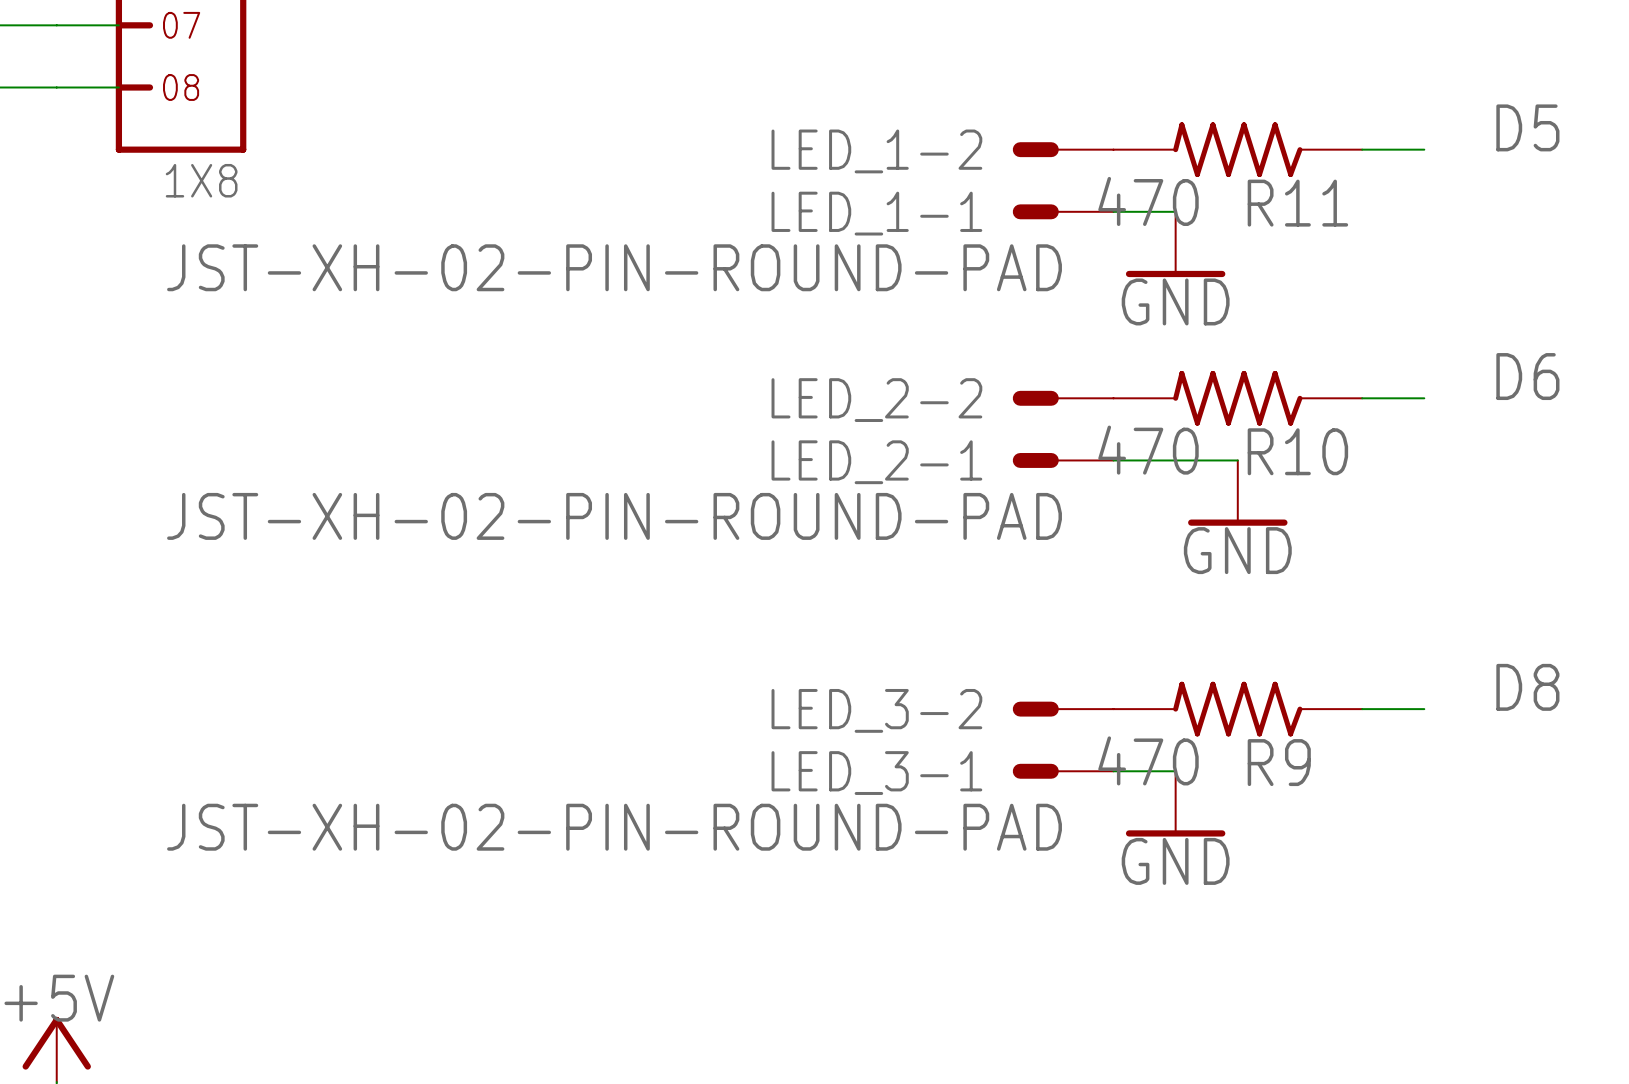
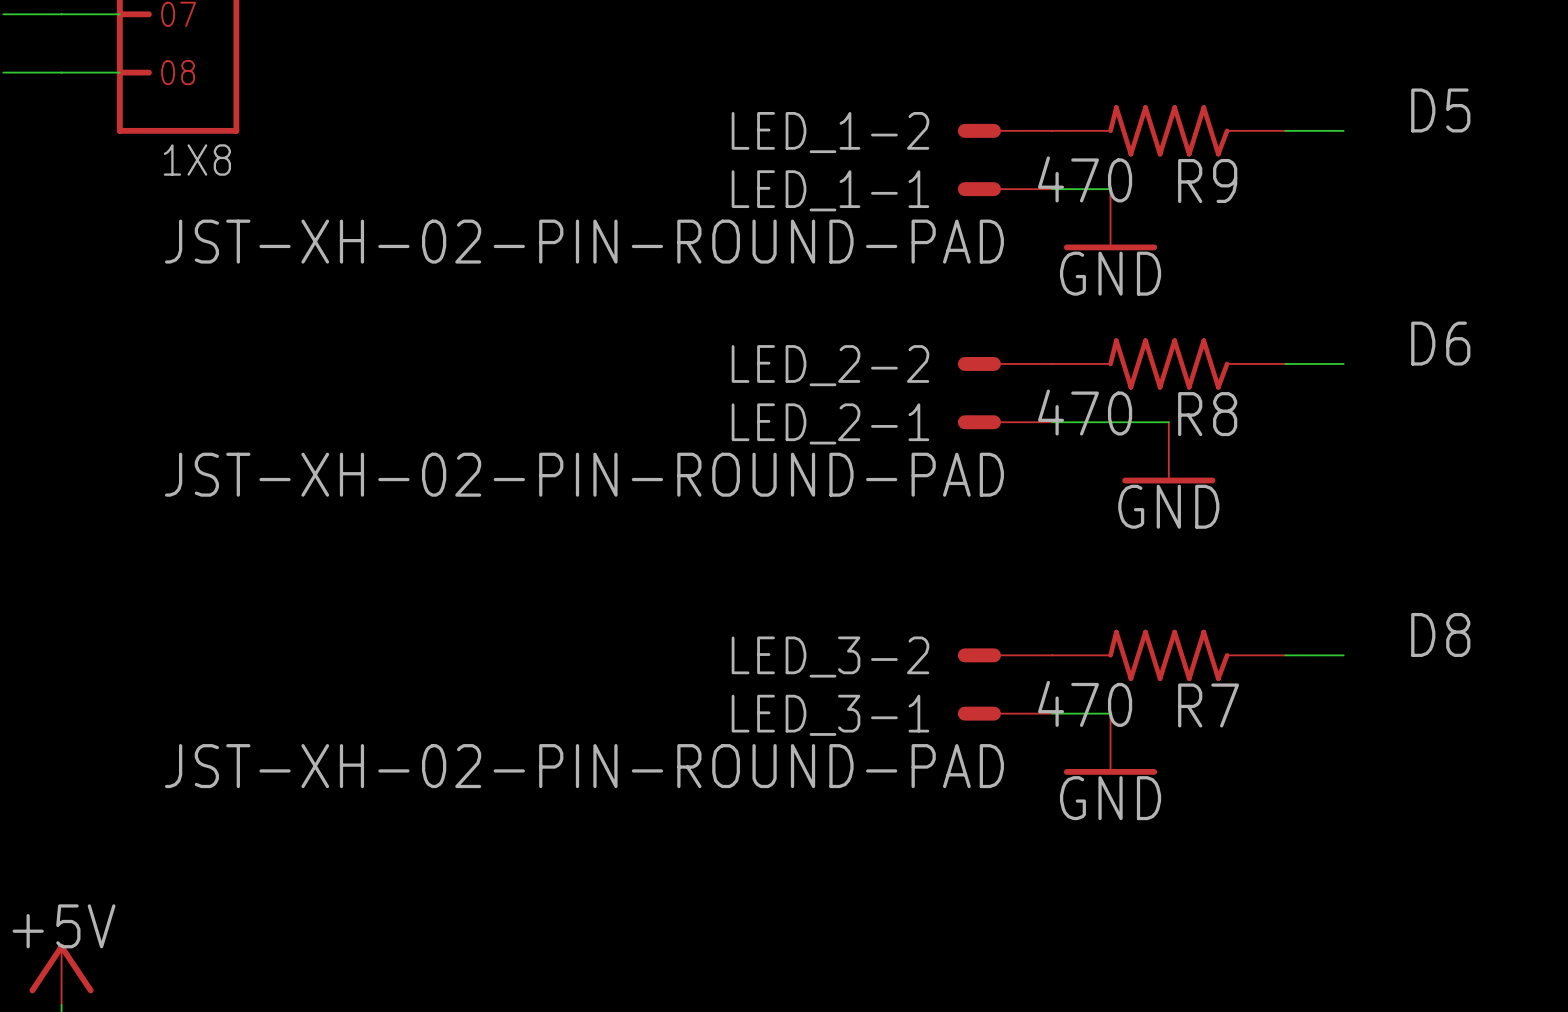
R11 name: R11 (1297, 203) -> R9 (1207, 180)
R10 name: R10 (1297, 451) -> R8 (1207, 414)
R9 name: R9 (1279, 762) -> R7 (1208, 705)

